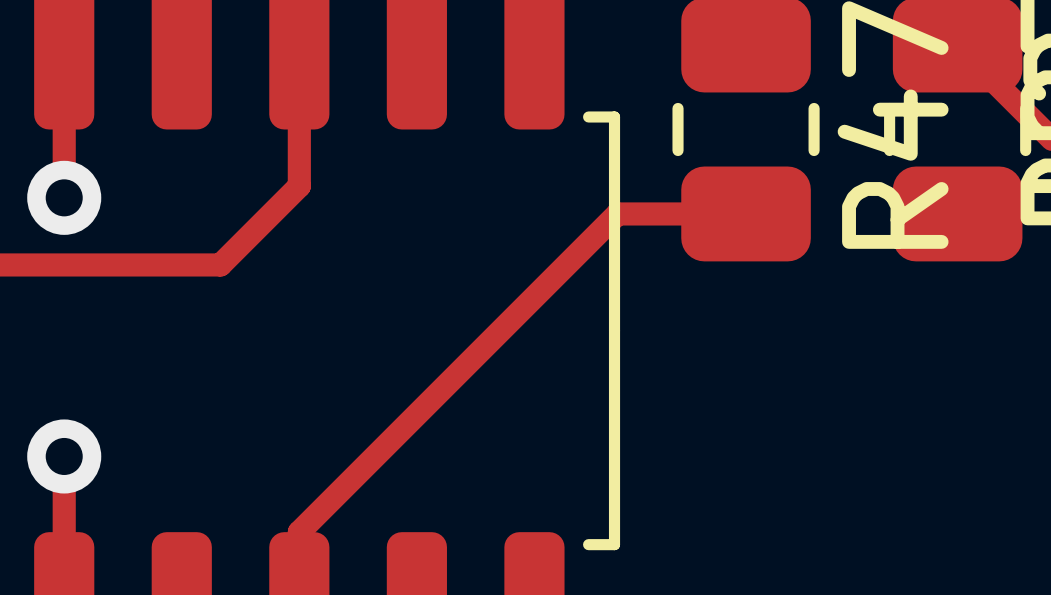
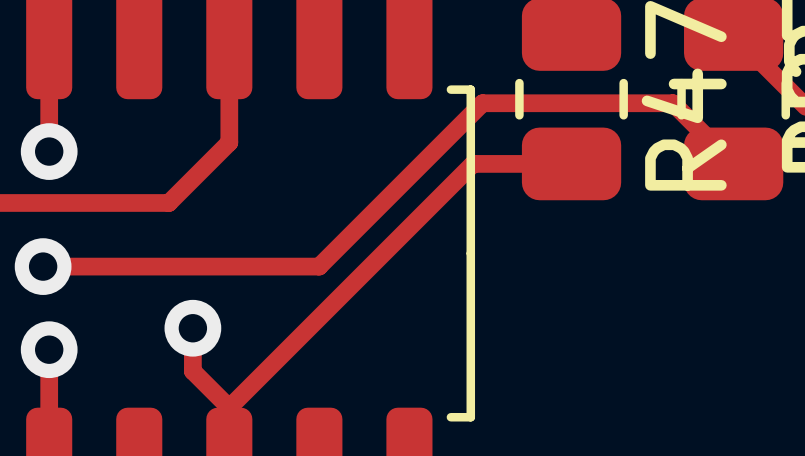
track: (617, 213) (299, 532) -> (473, 163) (229, 407) (192, 371) (192, 328)
track: none -> (733, 163) (672, 103) (482, 103) (319, 266) (43, 266)
via: none -> (43, 266)
via: none -> (192, 328)

